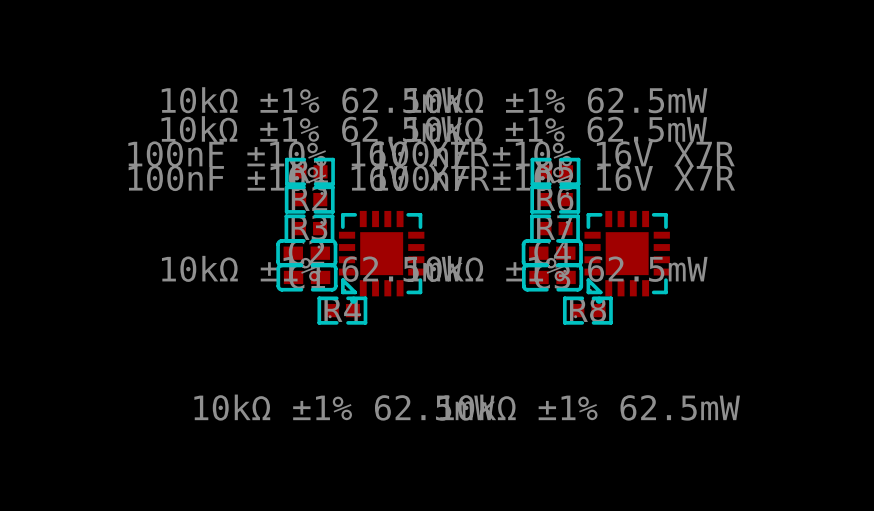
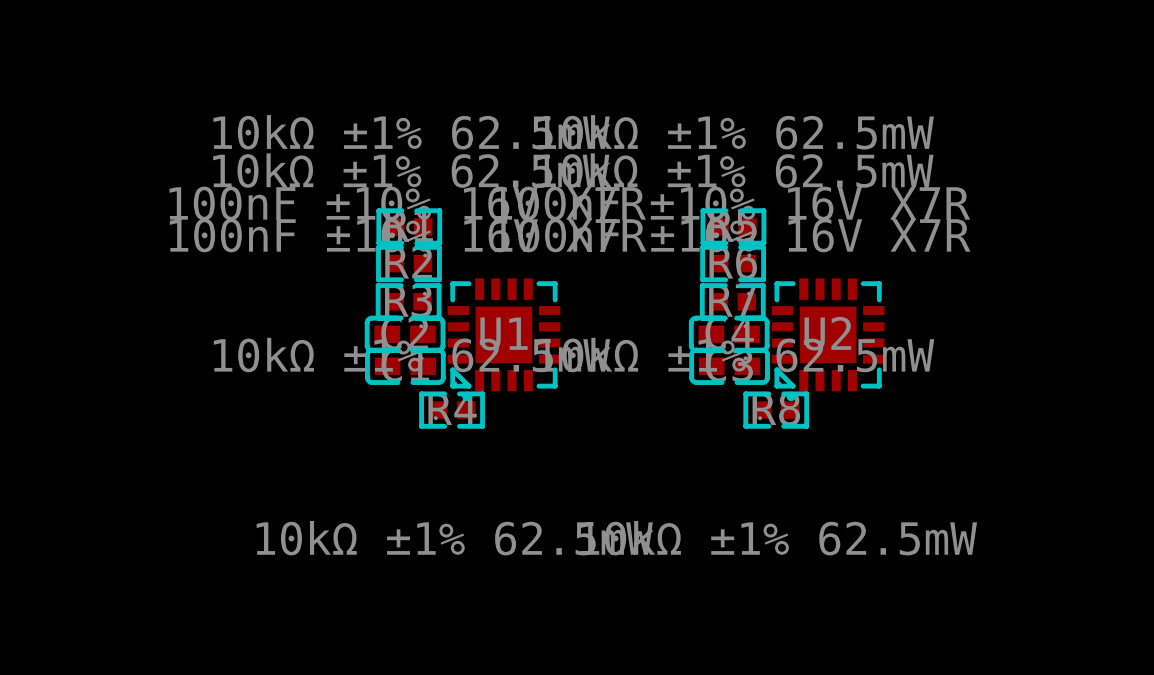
U1 name: none -> U1 (504, 333)
U2 name: none -> U2 (827, 333)

